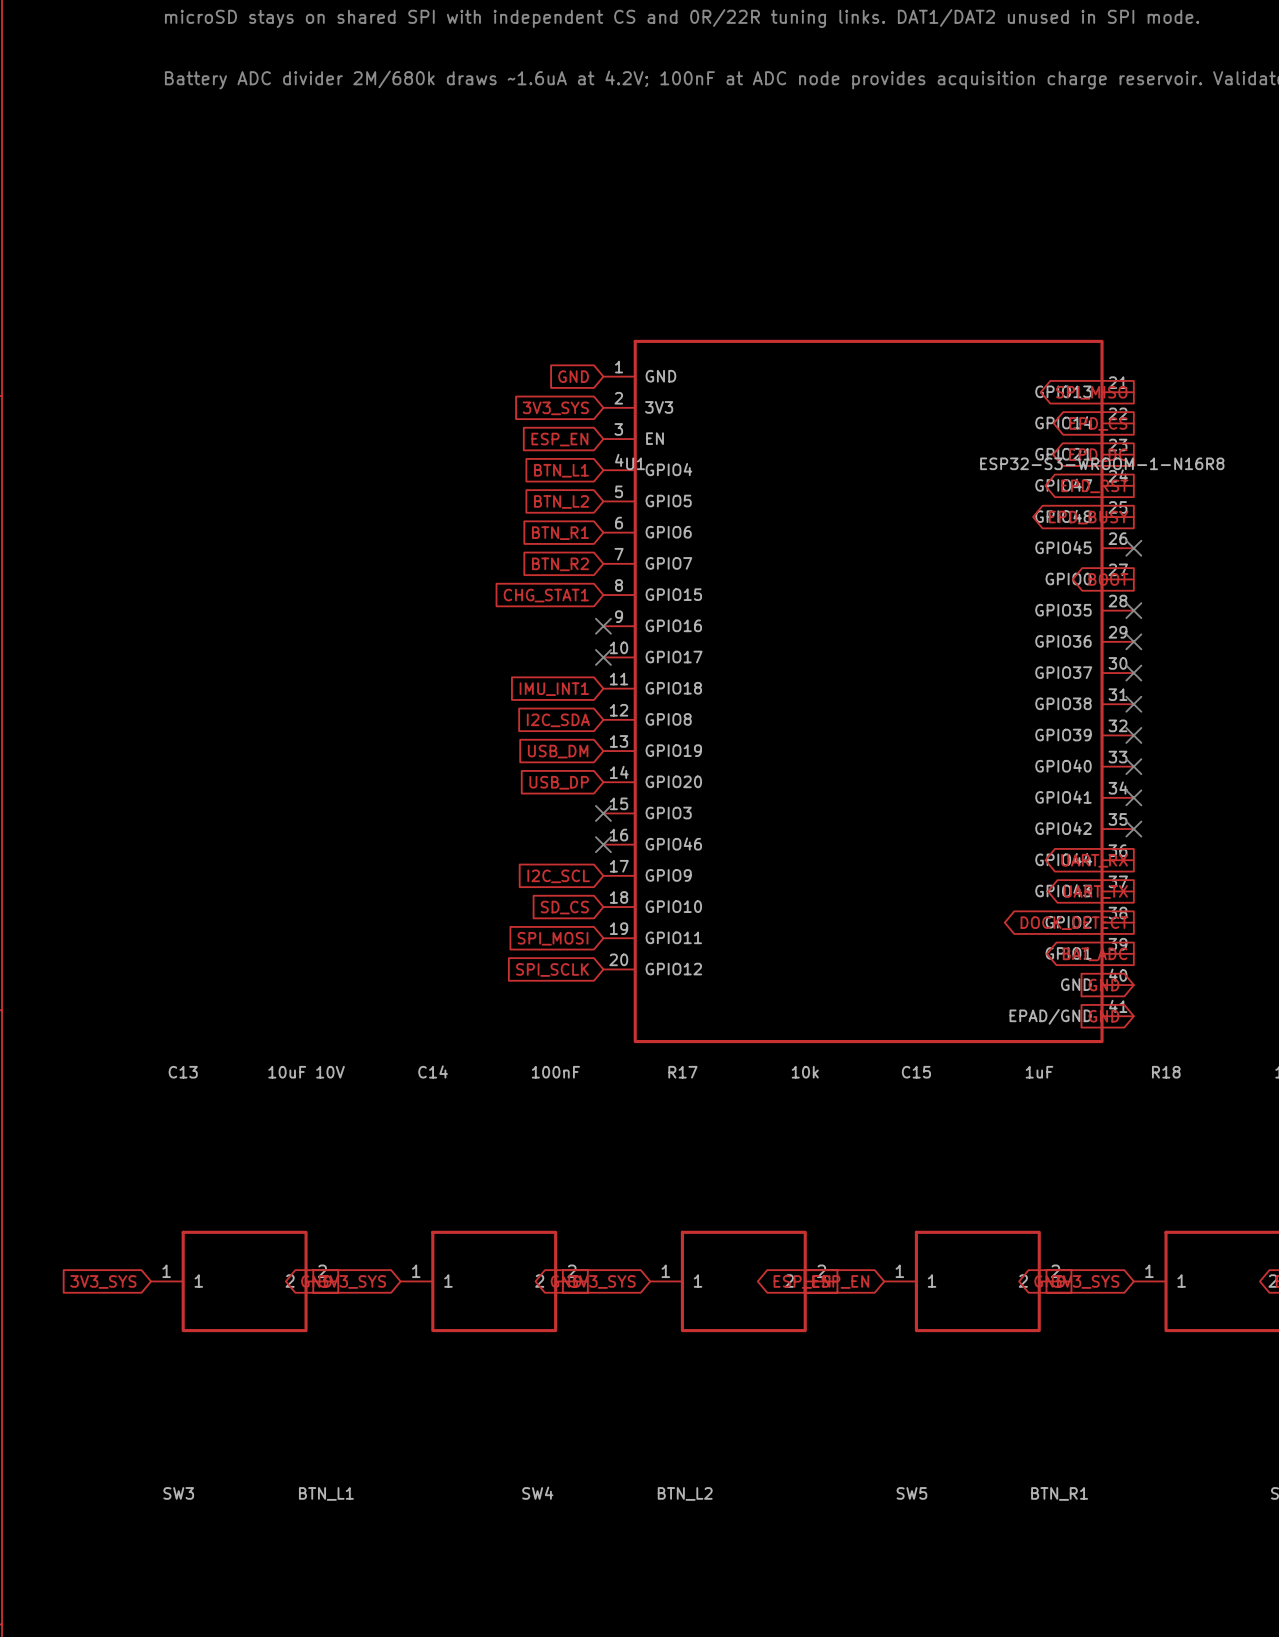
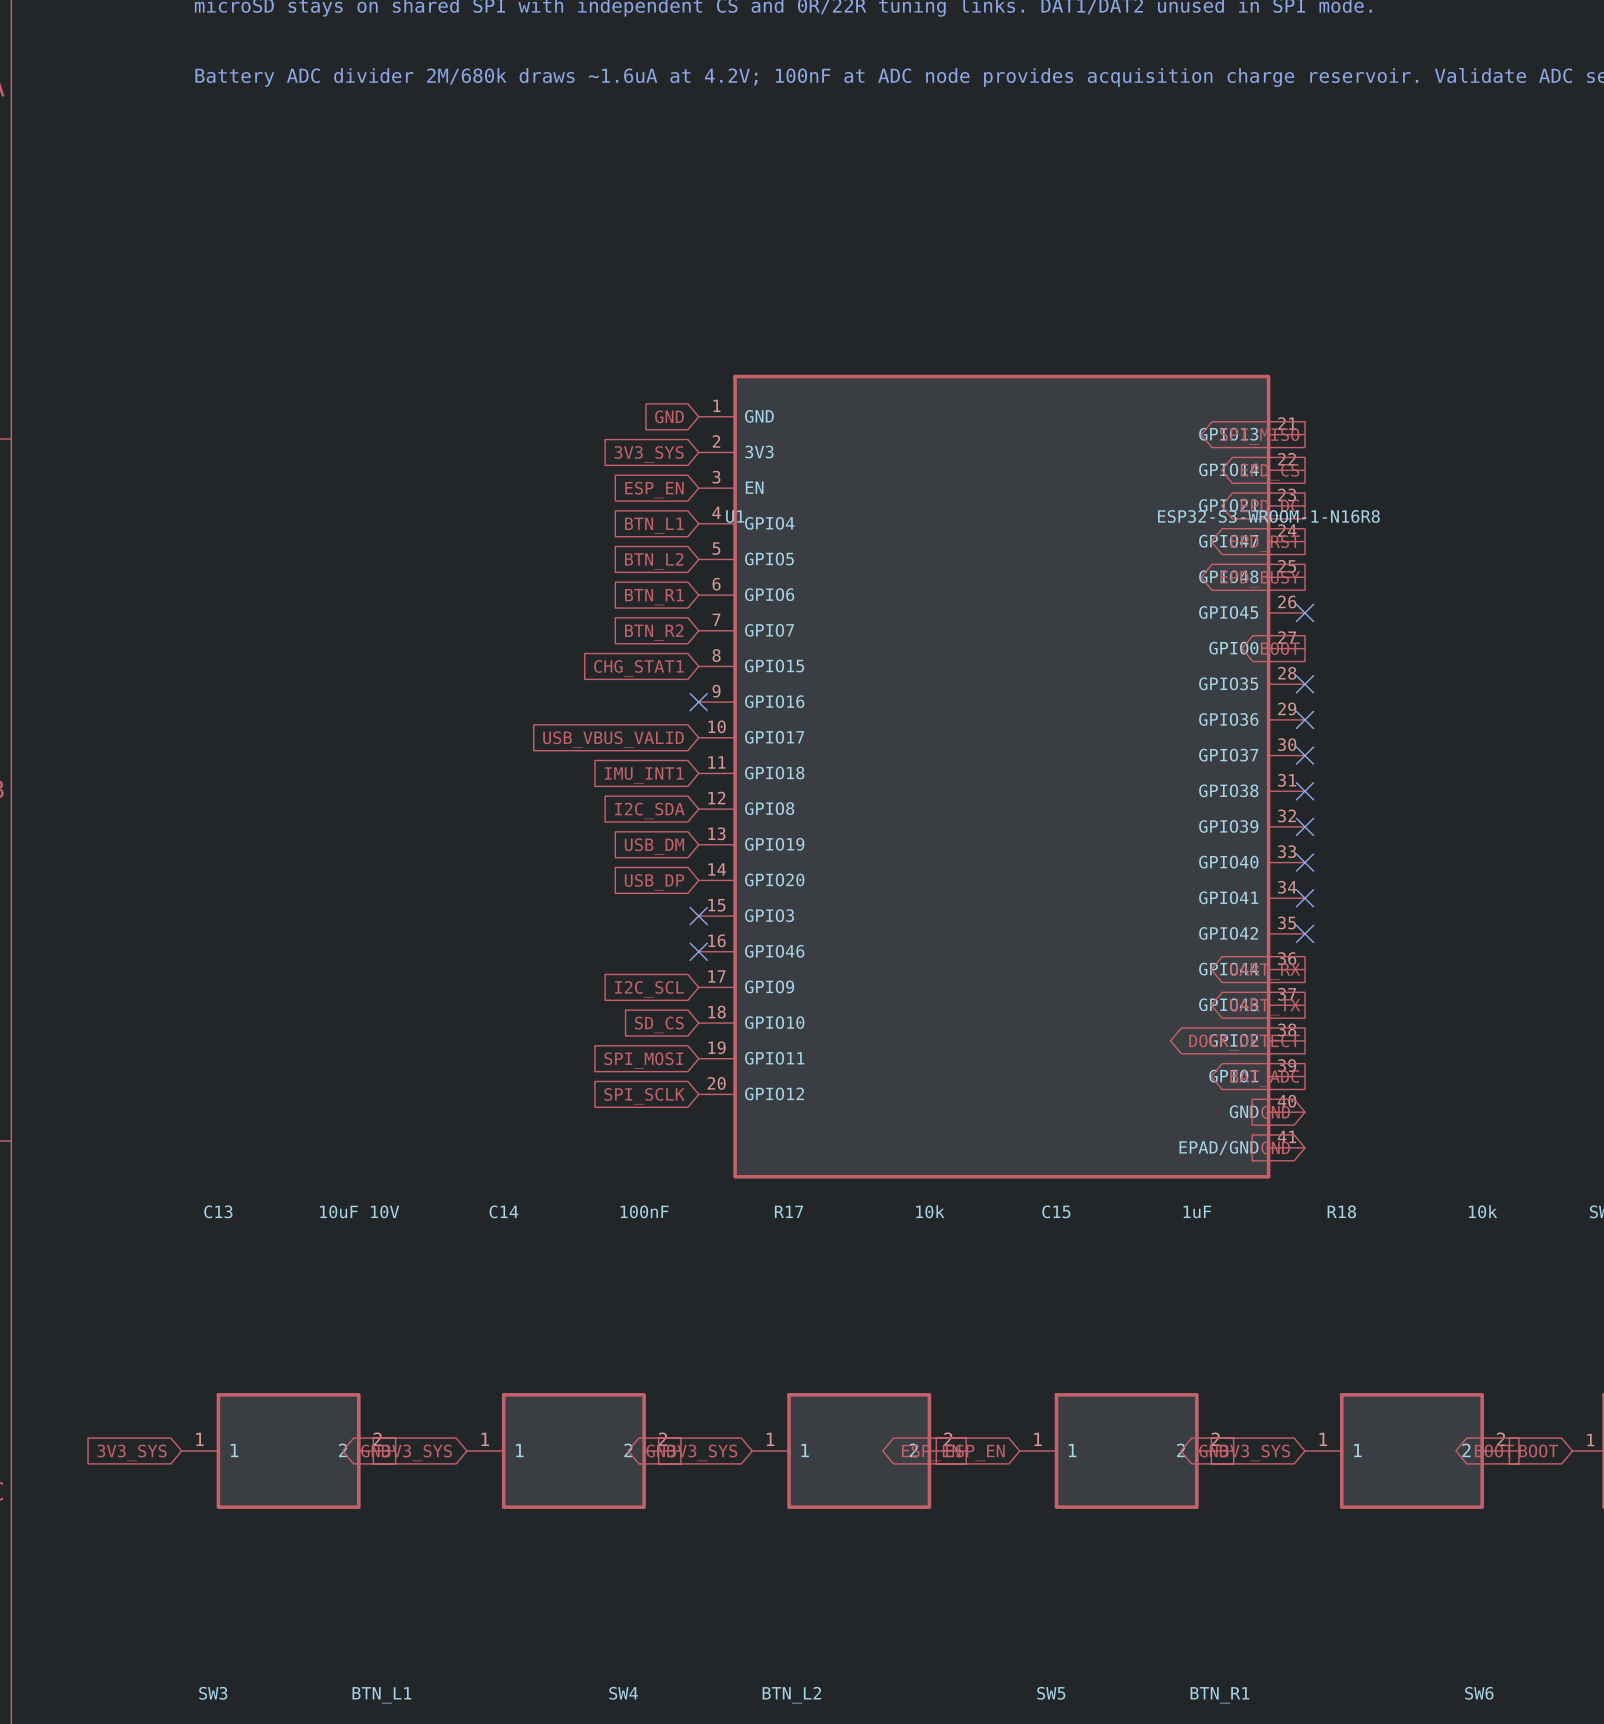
global label: none -> USB_VBUS_VALID (613, 739)
no-connect mark: (603, 657) -> none

